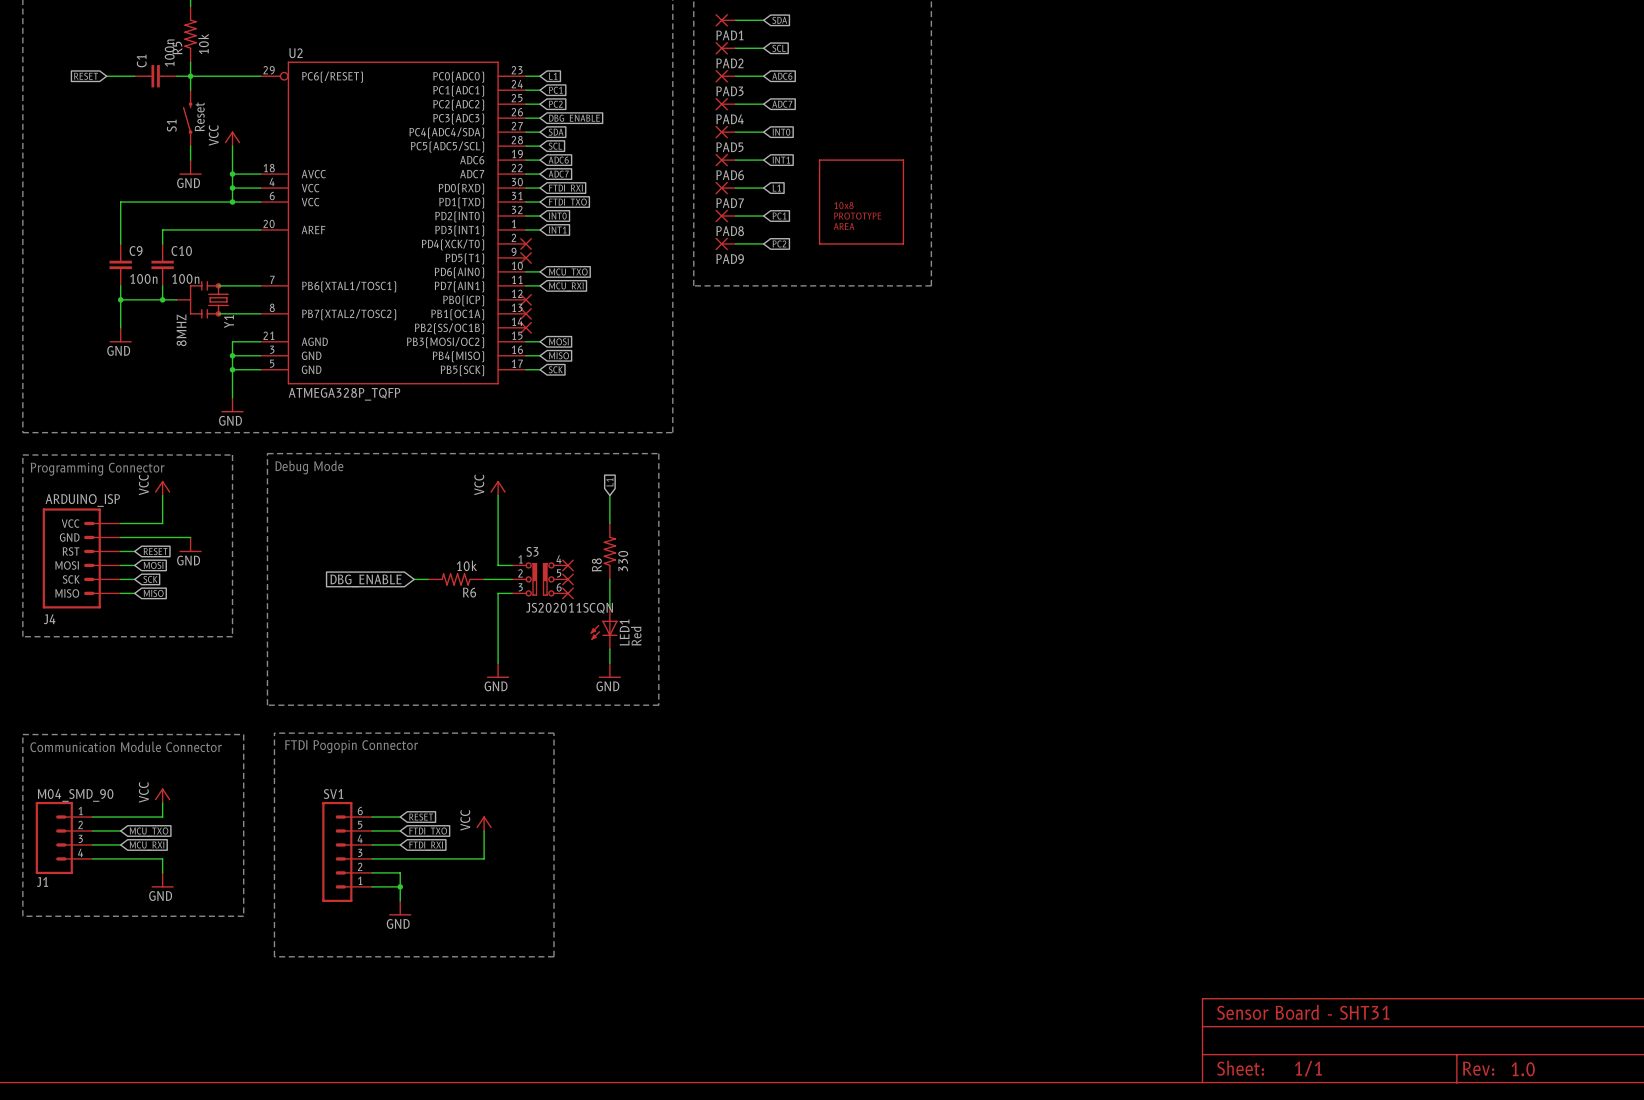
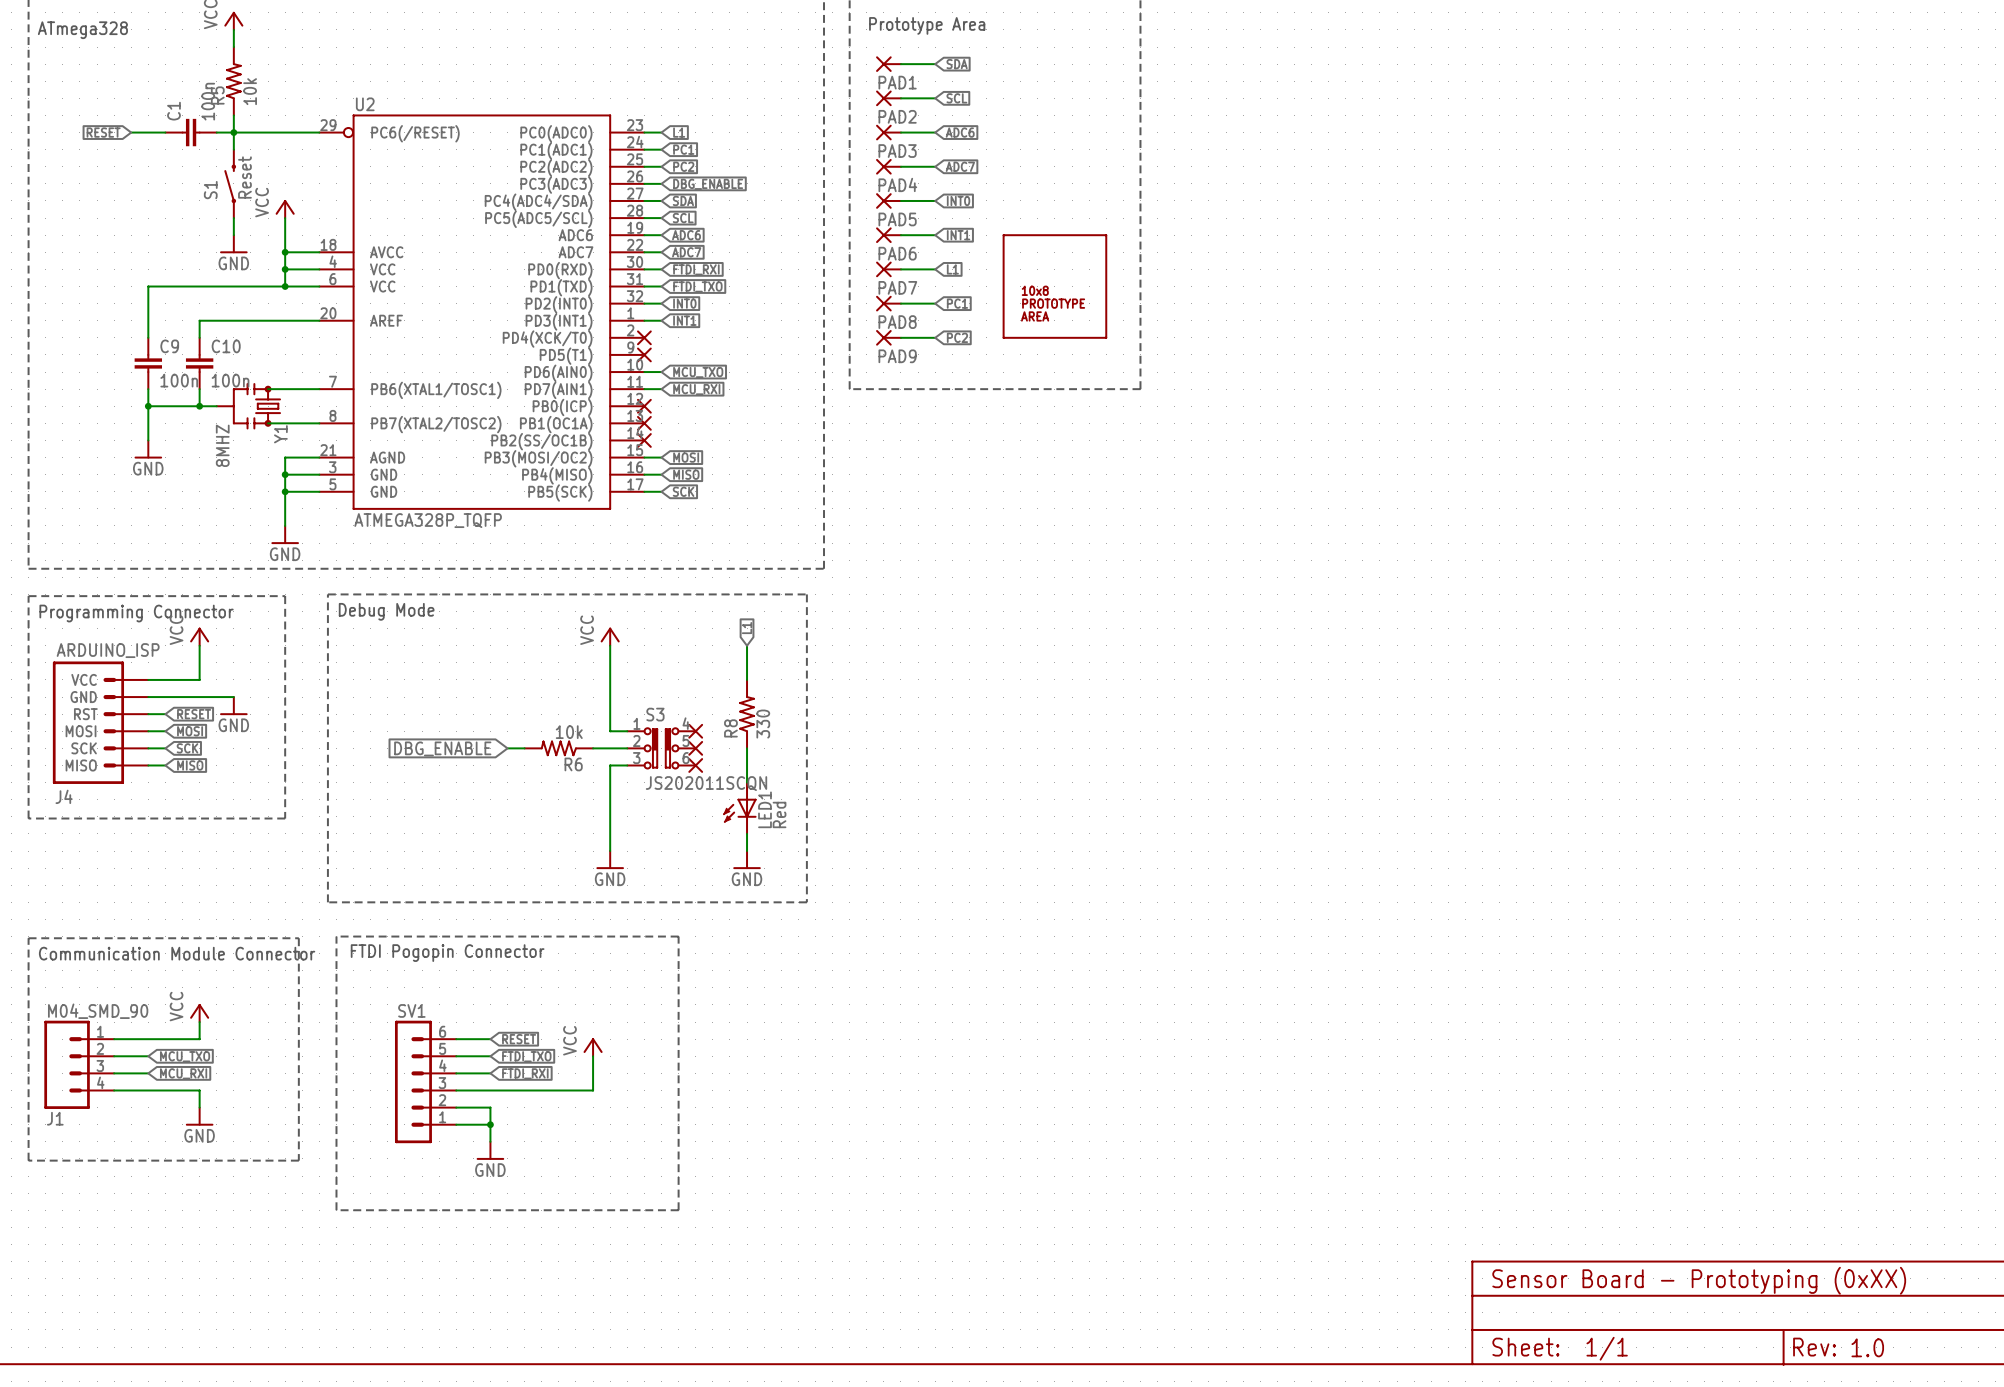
text: Sensor Board - SHT31 (1303, 1012) -> Sensor Board - Prototyping (0xXX) (1699, 1280)

